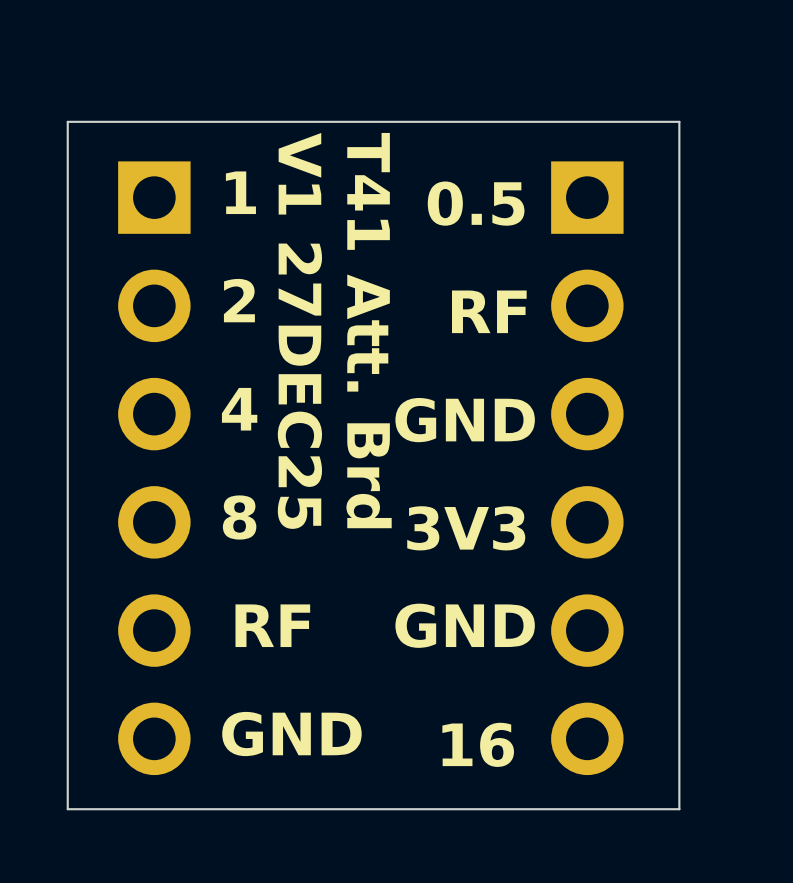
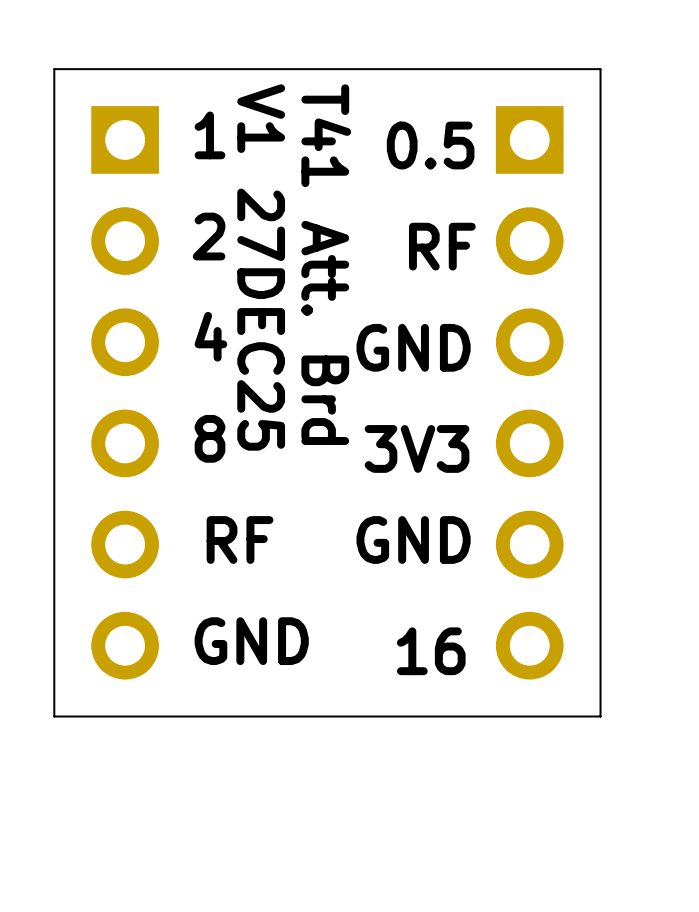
board edge: (663, 121) (679, 121) (679, 809) (67, 809) (67, 121) (78, 121) -> (600, 69) (600, 716) (54, 716) (54, 69)

